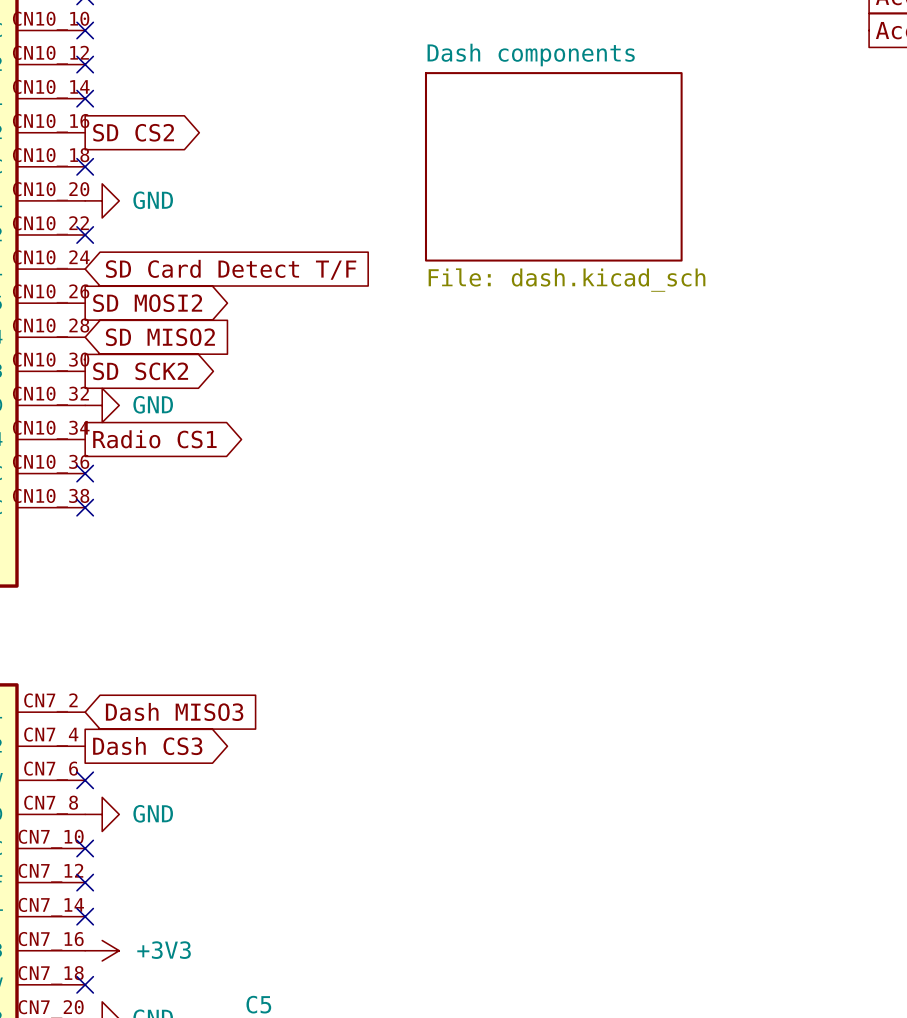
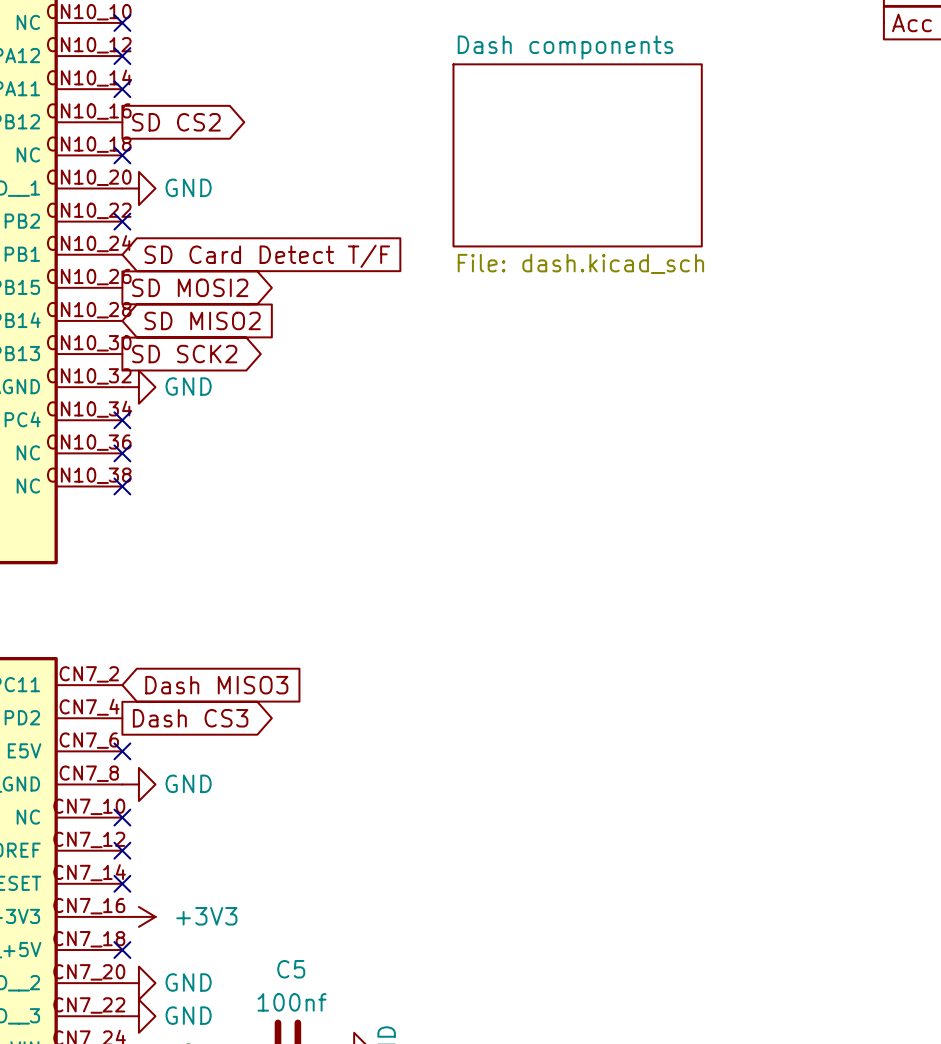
no-connect mark: none -> (122, 420)
global label: Radio CS1 (154, 439) -> none

